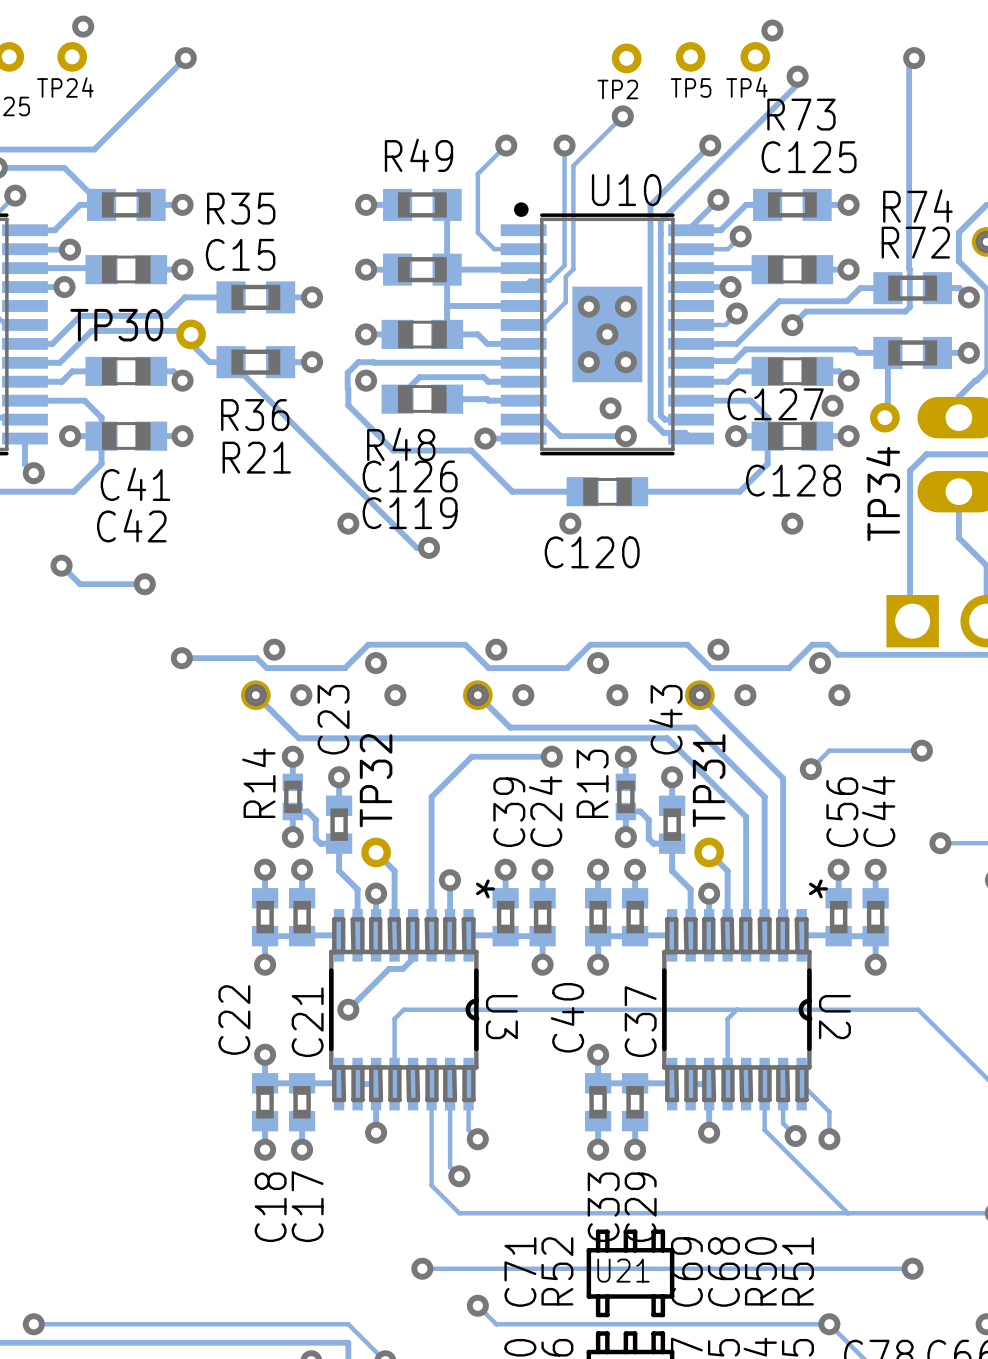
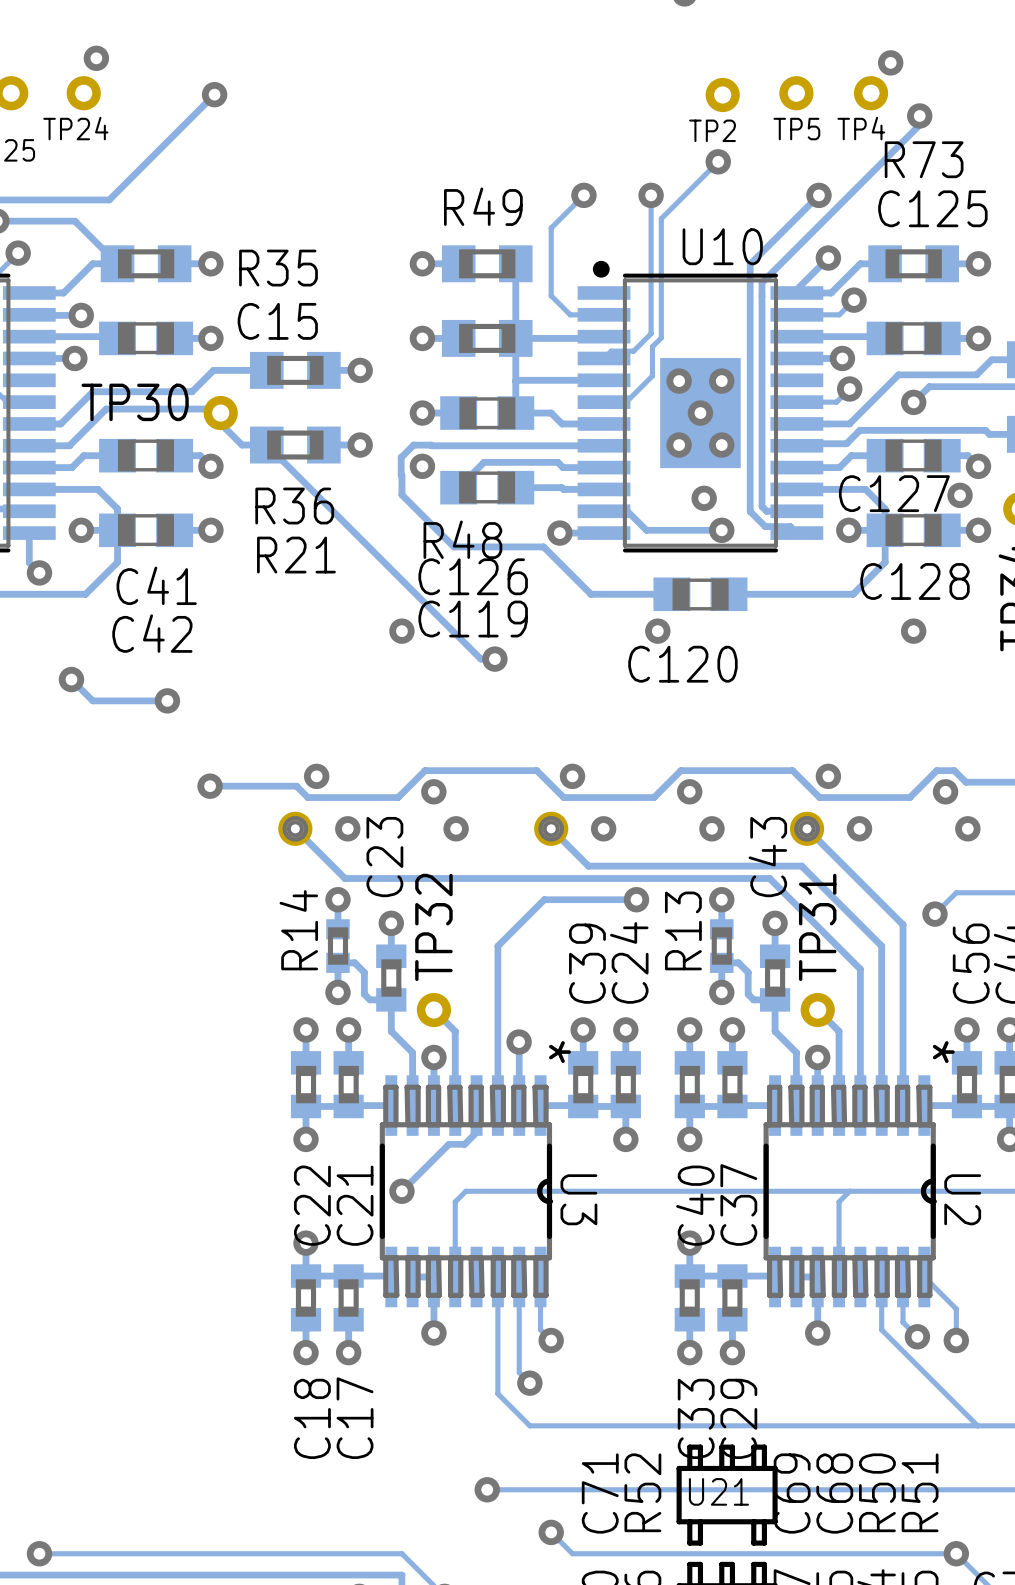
C40 name position: C40 (567, 1017) -> C40 (695, 1205)
C22 name position: C22 (234, 1020) -> C22 (312, 1205)

